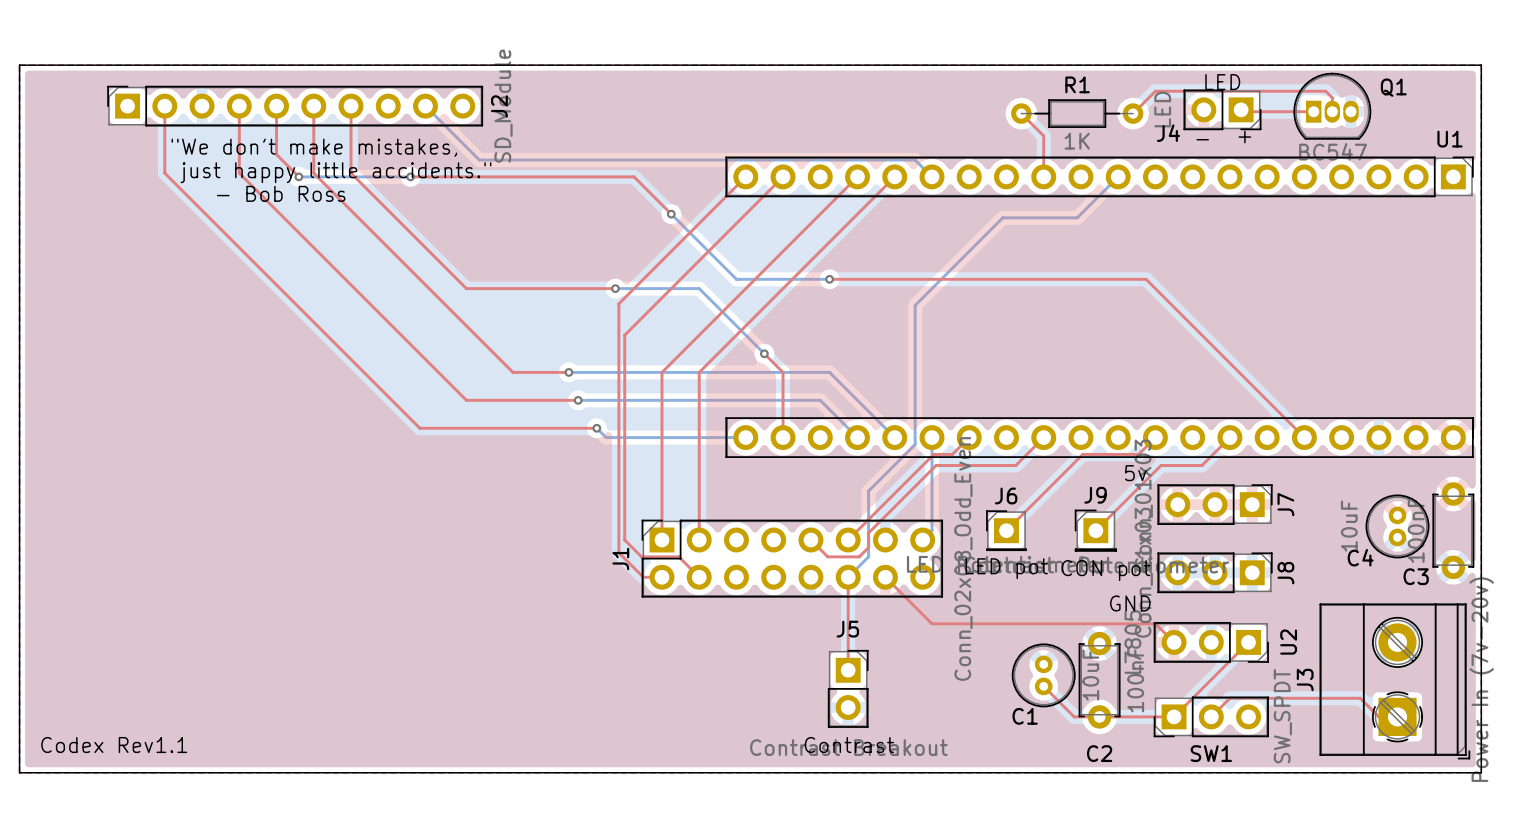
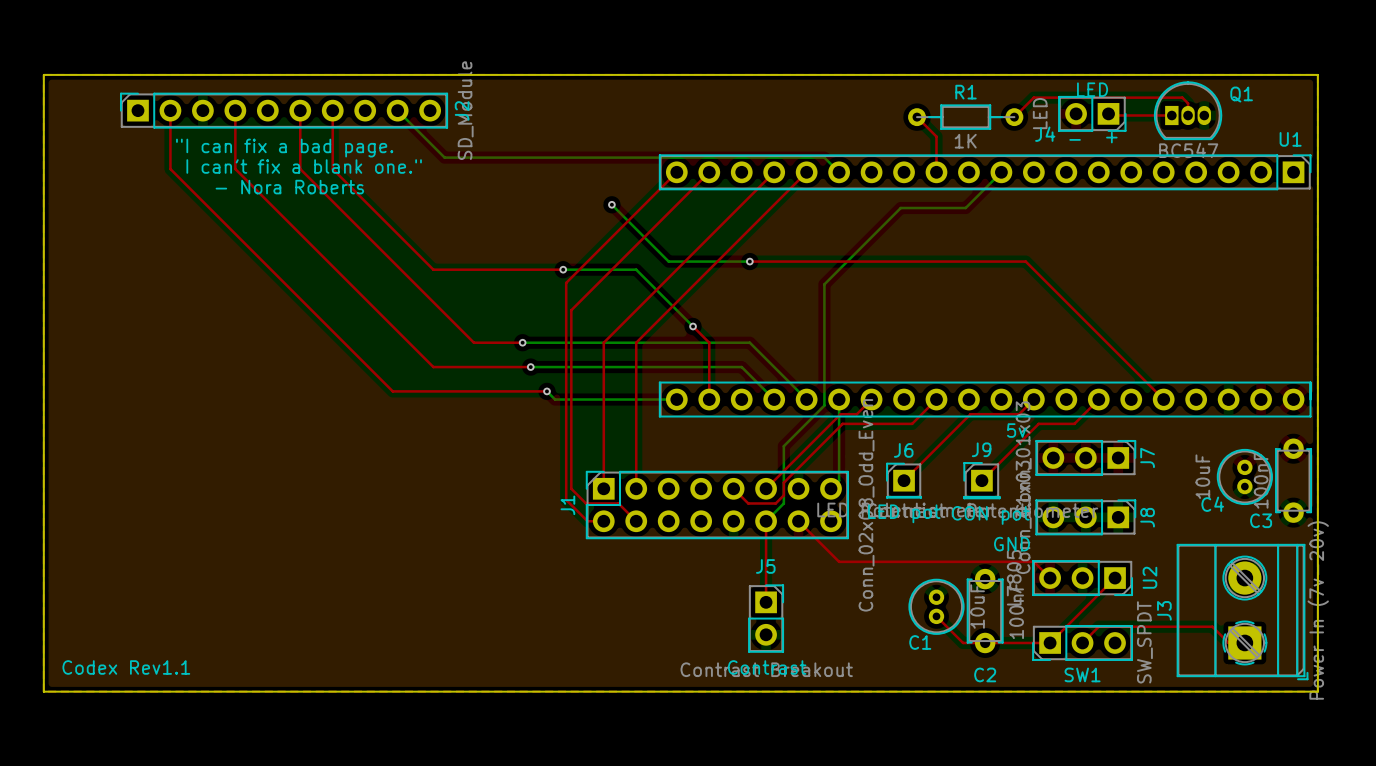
top track: (276, 106) (276, 154) (298, 176) -> none
text: "We don't make mistakes, (314, 147) -> "I can fix a bad page. (284, 148)
text: just happy little accidents." (336, 172) -> I can't fix a blank one." (304, 166)
bottom track: (298, 176) (410, 176) -> none
via: (298, 176) -> none
top track: (410, 176) (634, 176) (671, 214) -> none
via: (410, 176) -> none
text: - Bob Ross (281, 193) -> - Nora Roberts (289, 187)

